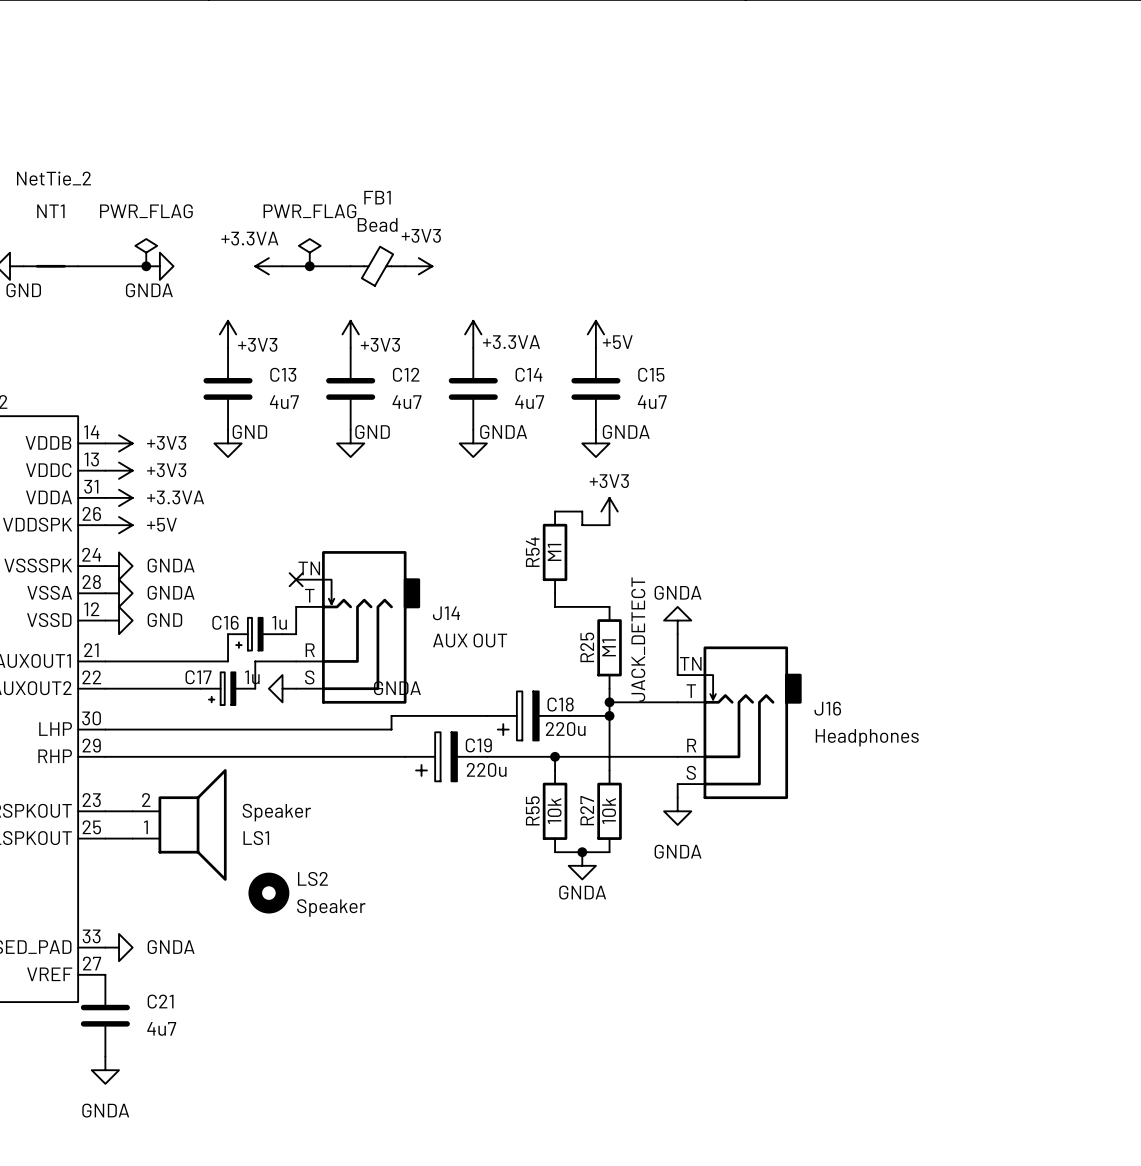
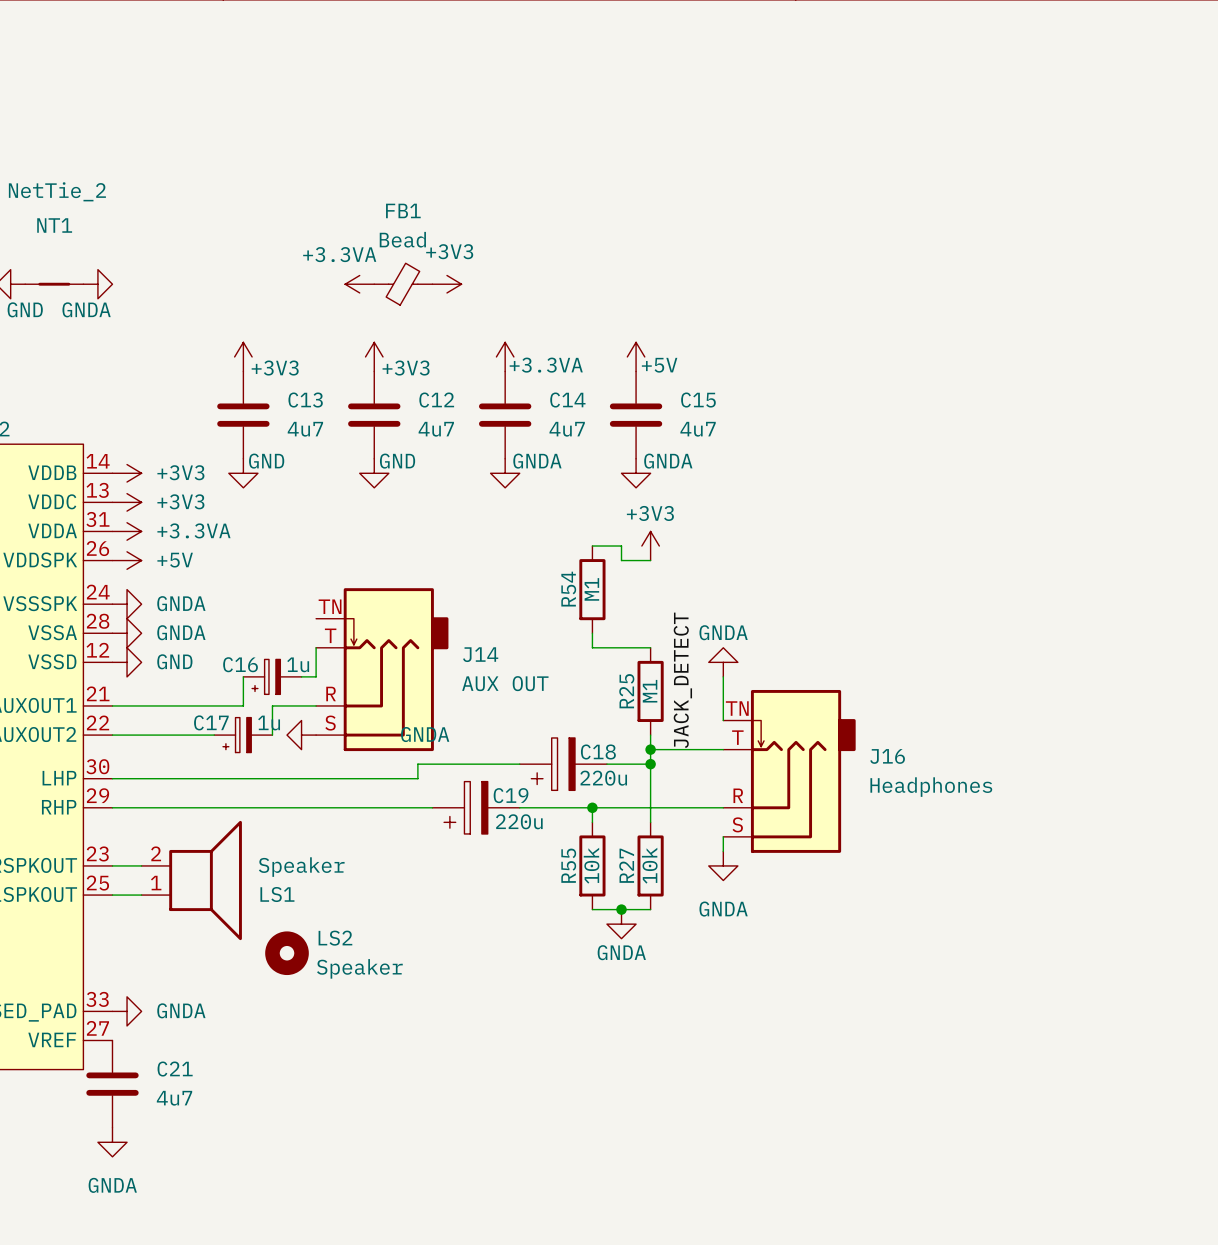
power symbol: PWR_FLAG (146, 252) -> none
power symbol: PWR_FLAG (309, 252) -> none
wire: (78, 266) (146, 266) -> none
junction: (146, 266) -> none
power symbol position: GNDA (159, 266) -> GNDA (97, 284)
power symbol position: +3.3VA (268, 266) -> +3.3VA (359, 284)
wire: (282, 266) (350, 266) -> none
junction: (309, 266) -> none
no-connect mark: (296, 579) -> none

